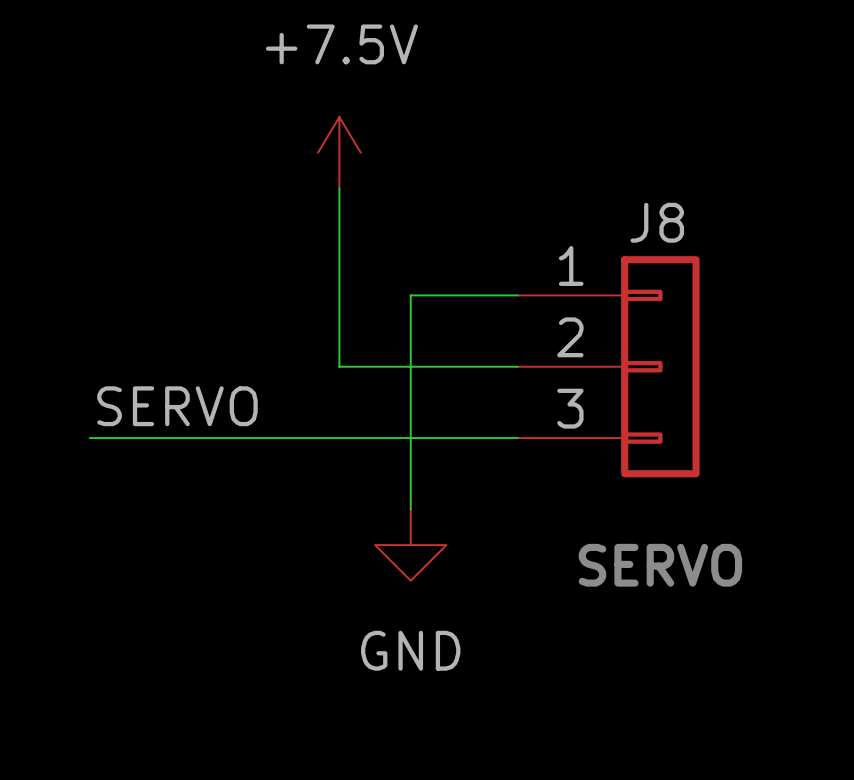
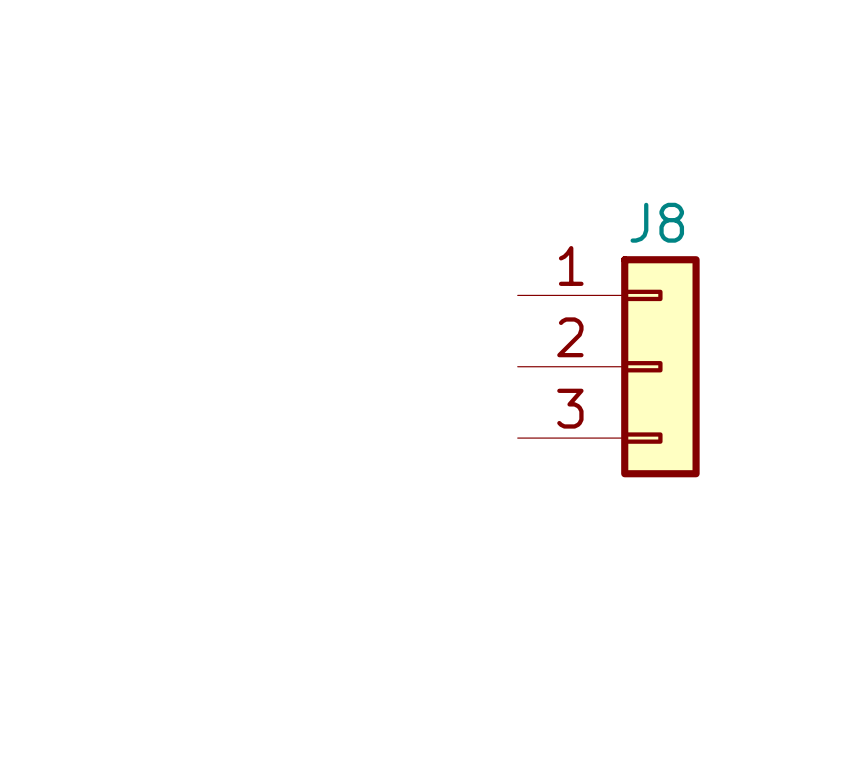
power symbol: +7.5V (339, 152) -> none
wire: (339, 188) (339, 366) (517, 366) -> none
wire: (517, 295) (410, 295) (410, 509) -> none
label: SERVO (177, 406) -> none
wire: (89, 438) (517, 438) -> none
power symbol: GND (410, 545) -> none
text: SERVO (660, 565) -> none

